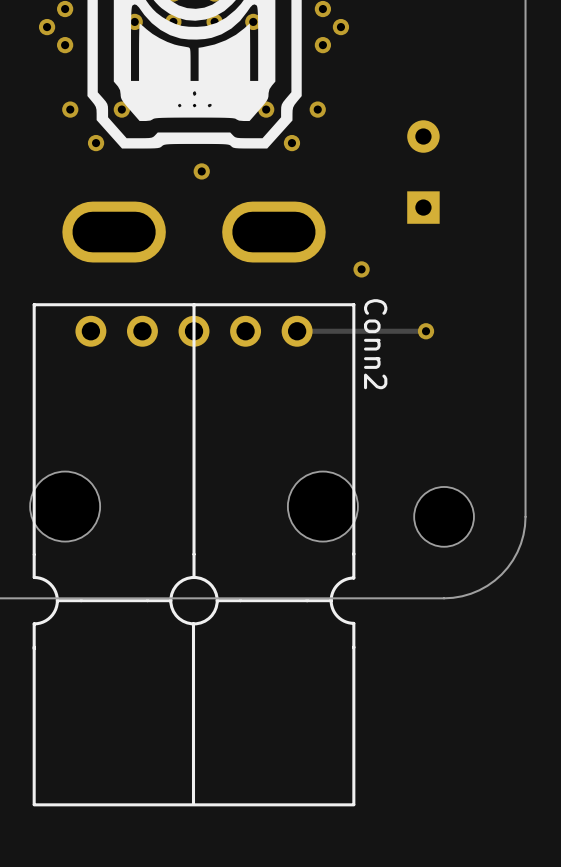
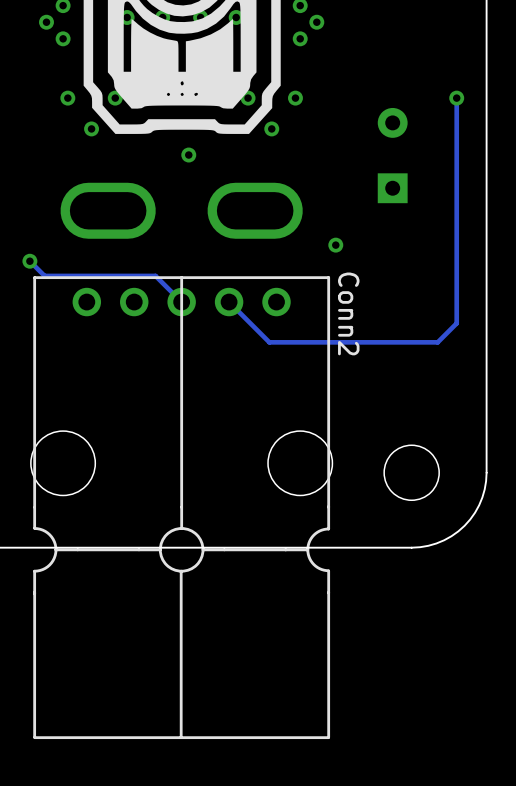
track: none -> (456, 98) (456, 323) (437, 342) (269, 342) (229, 302)
via: none -> (456, 98)
track: none -> (29, 261) (44, 275) (155, 275) (181, 302)
via: none -> (29, 261)
track: (426, 331) (297, 331) -> none
via: (426, 331) -> none

